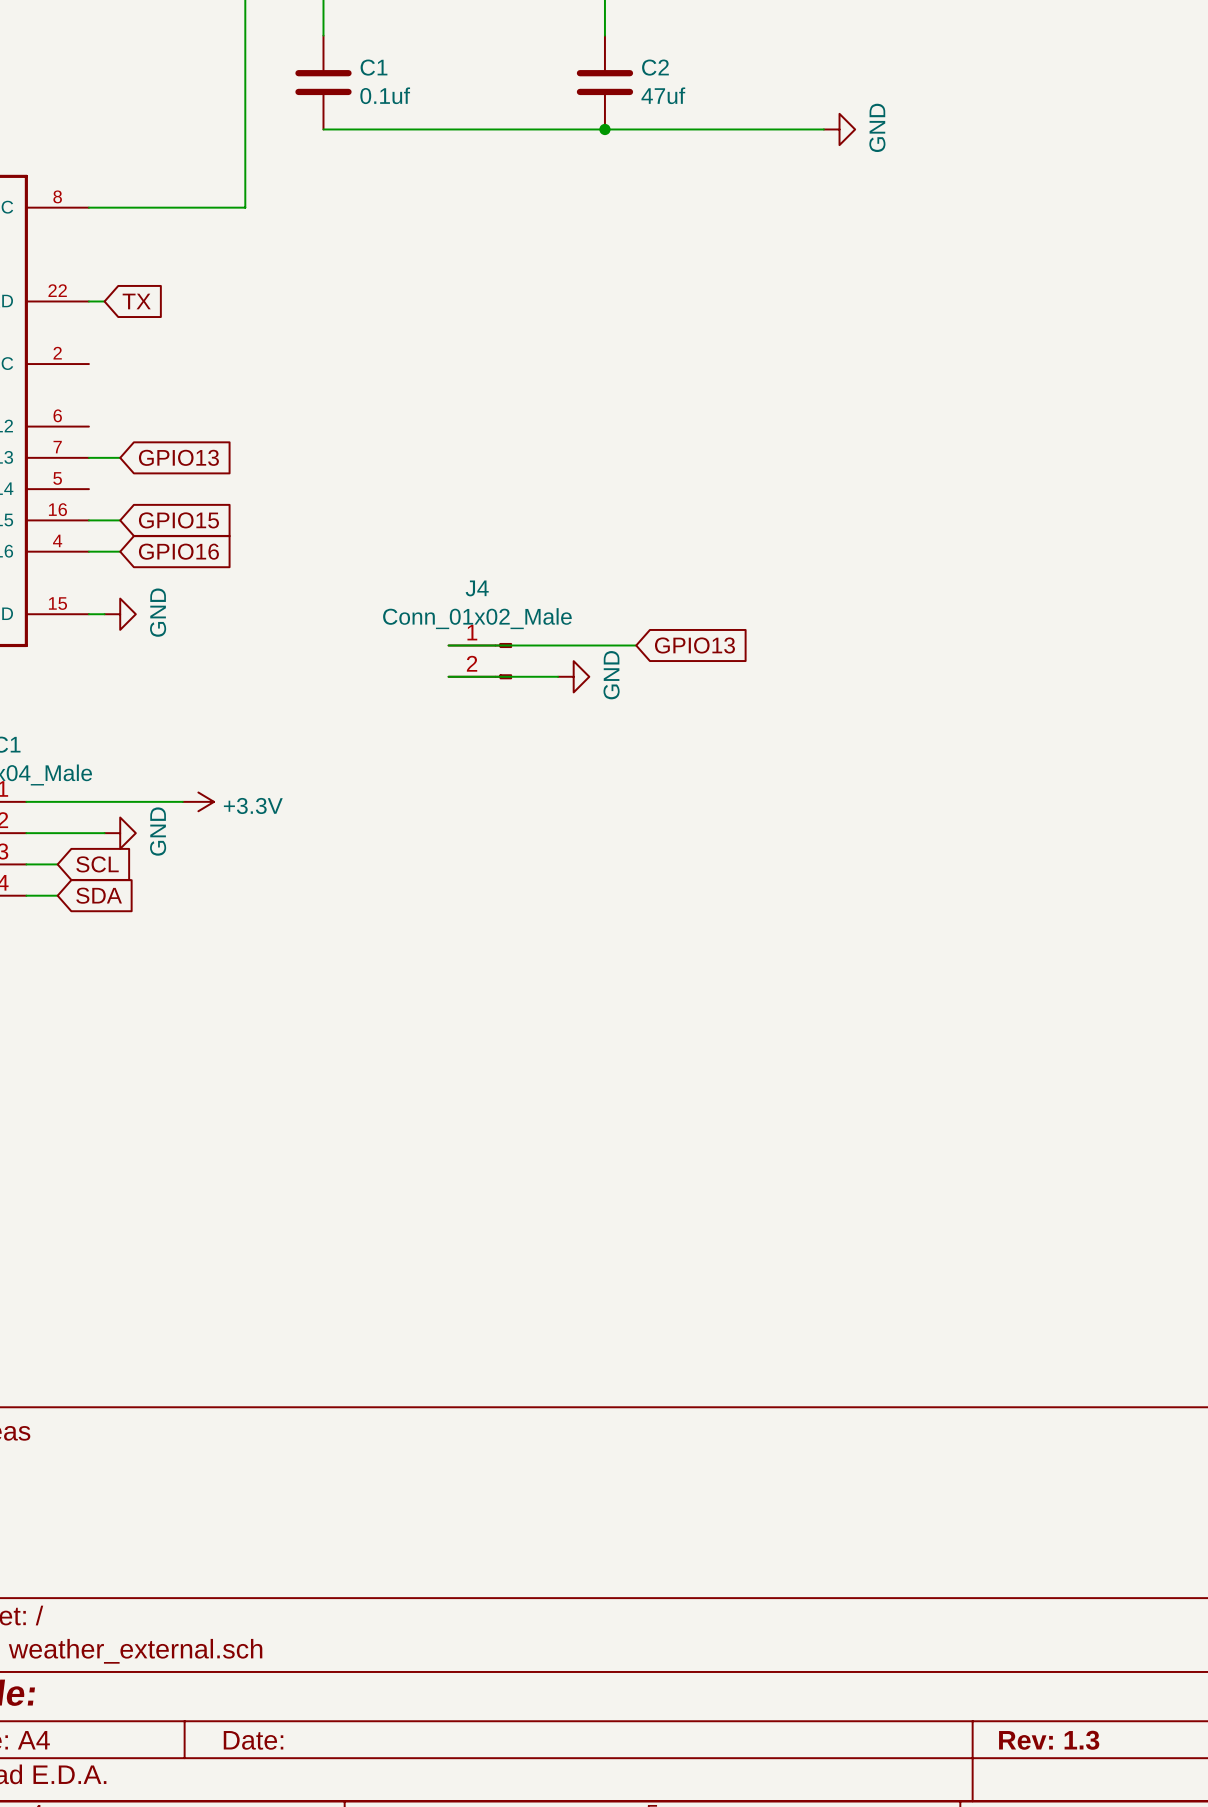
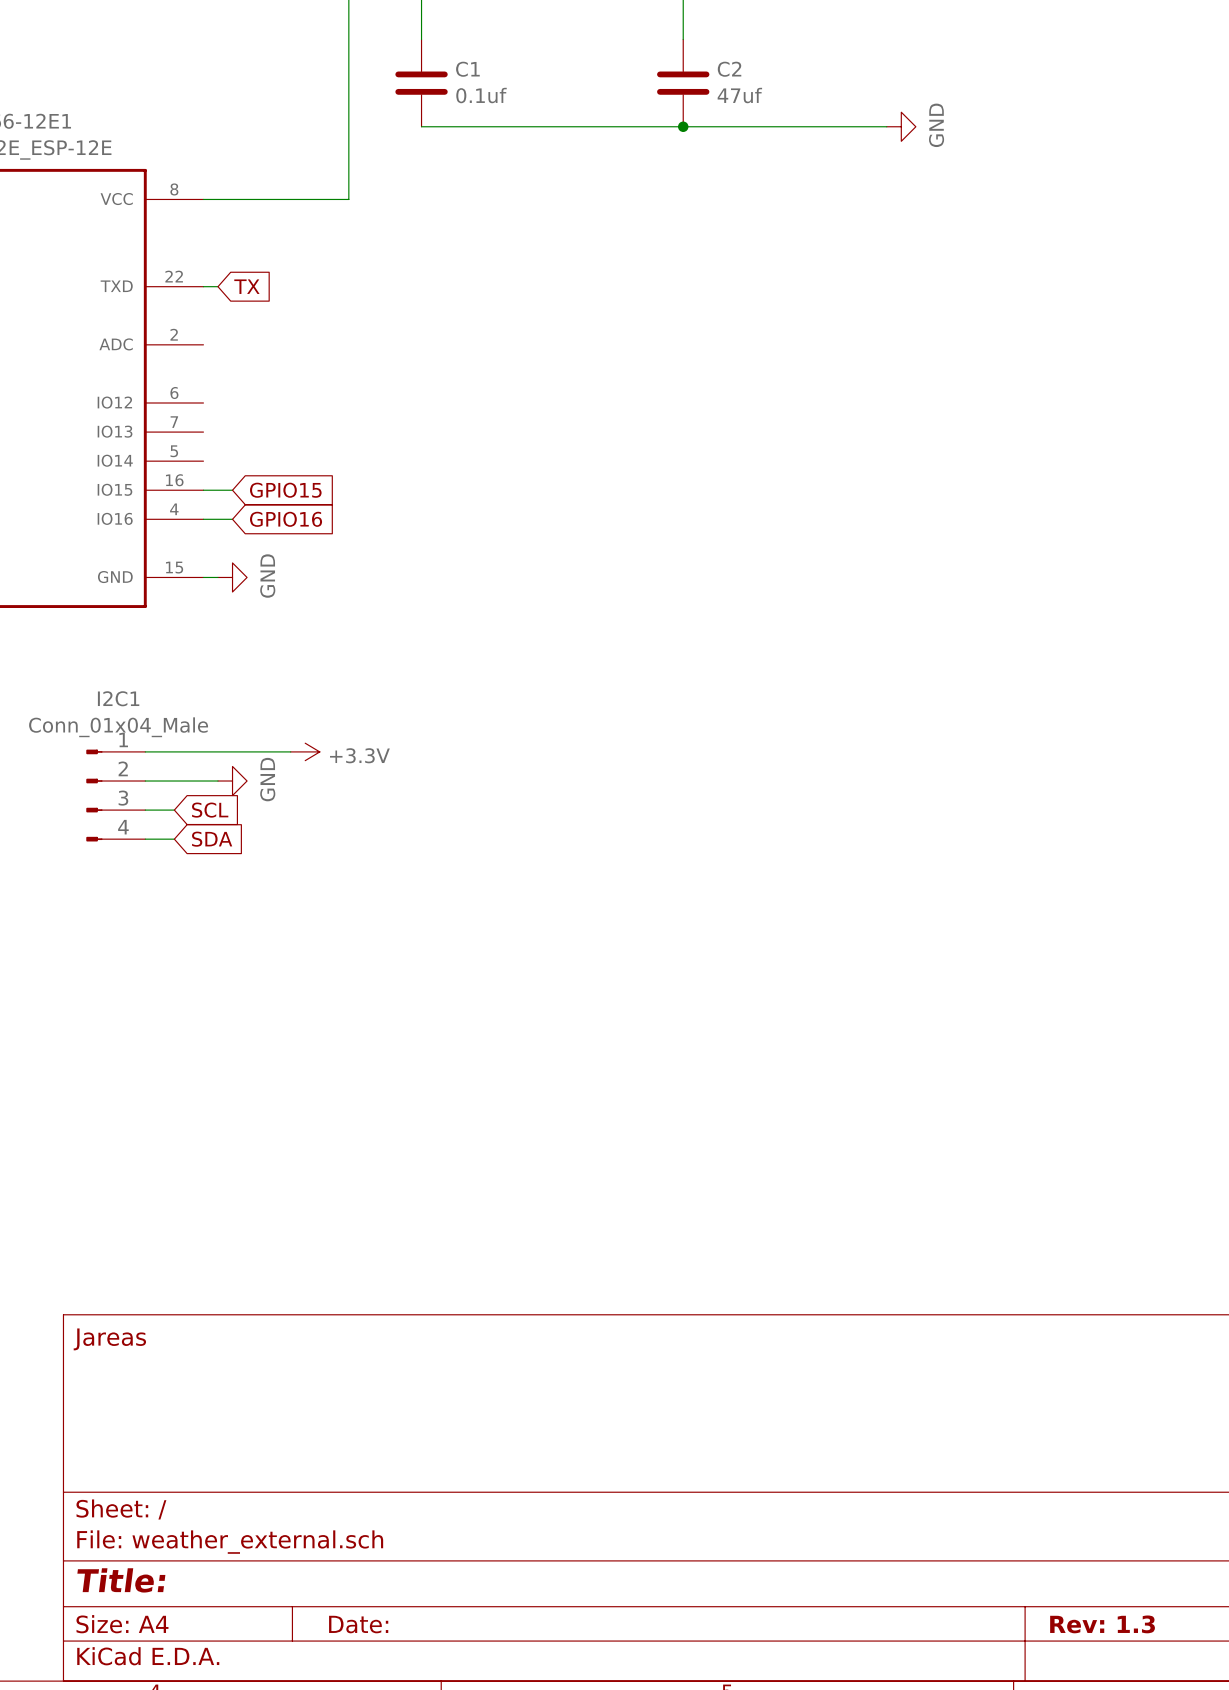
wire: (88, 457) (120, 457) -> none
global label: GPIO13 (178, 457) -> none
wire: (448, 645) (636, 645) -> none
global label: GPIO13 (694, 645) -> none
J4: Conn_01x02_Male (480, 661) -> none
wire: (448, 676) (558, 676) -> none
power symbol: GND (573, 676) -> none

